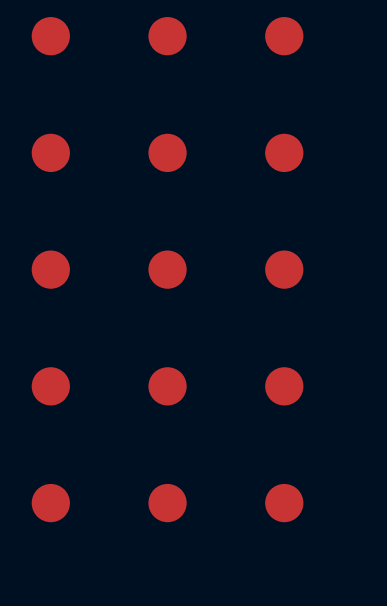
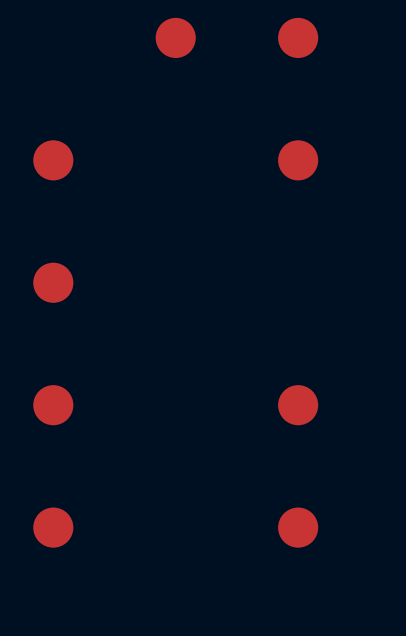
part: (50, 36) -> none
part: (167, 152) -> none
part: (167, 269) -> none
part: (284, 269) -> none
part: (167, 386) -> none
part: (167, 503) -> none

